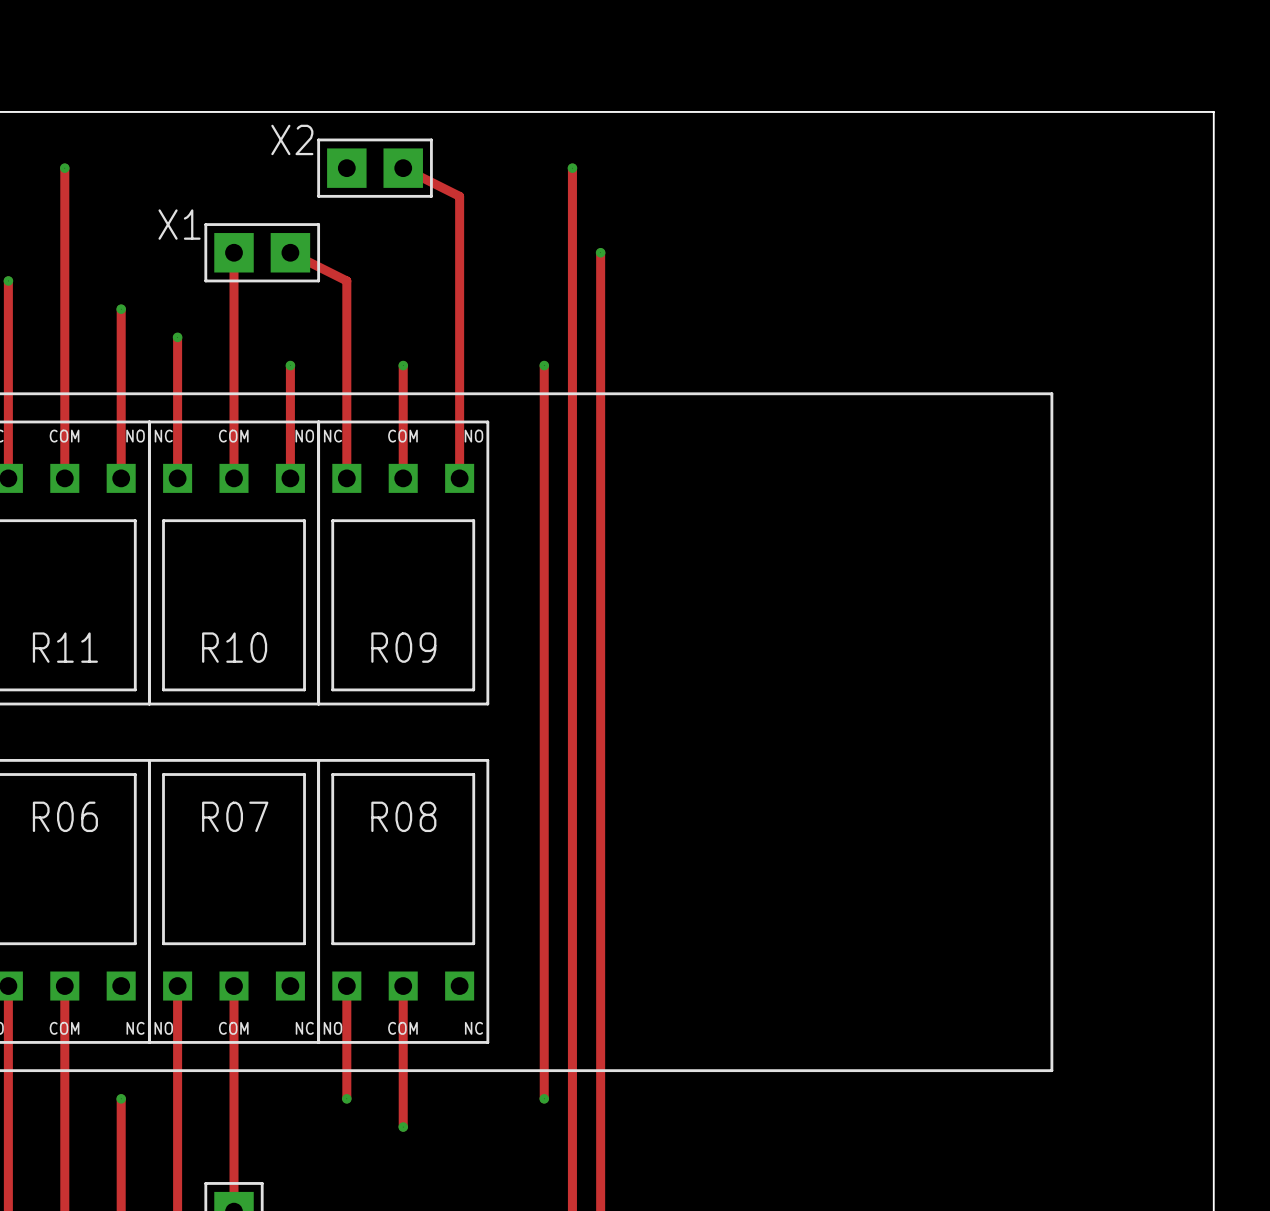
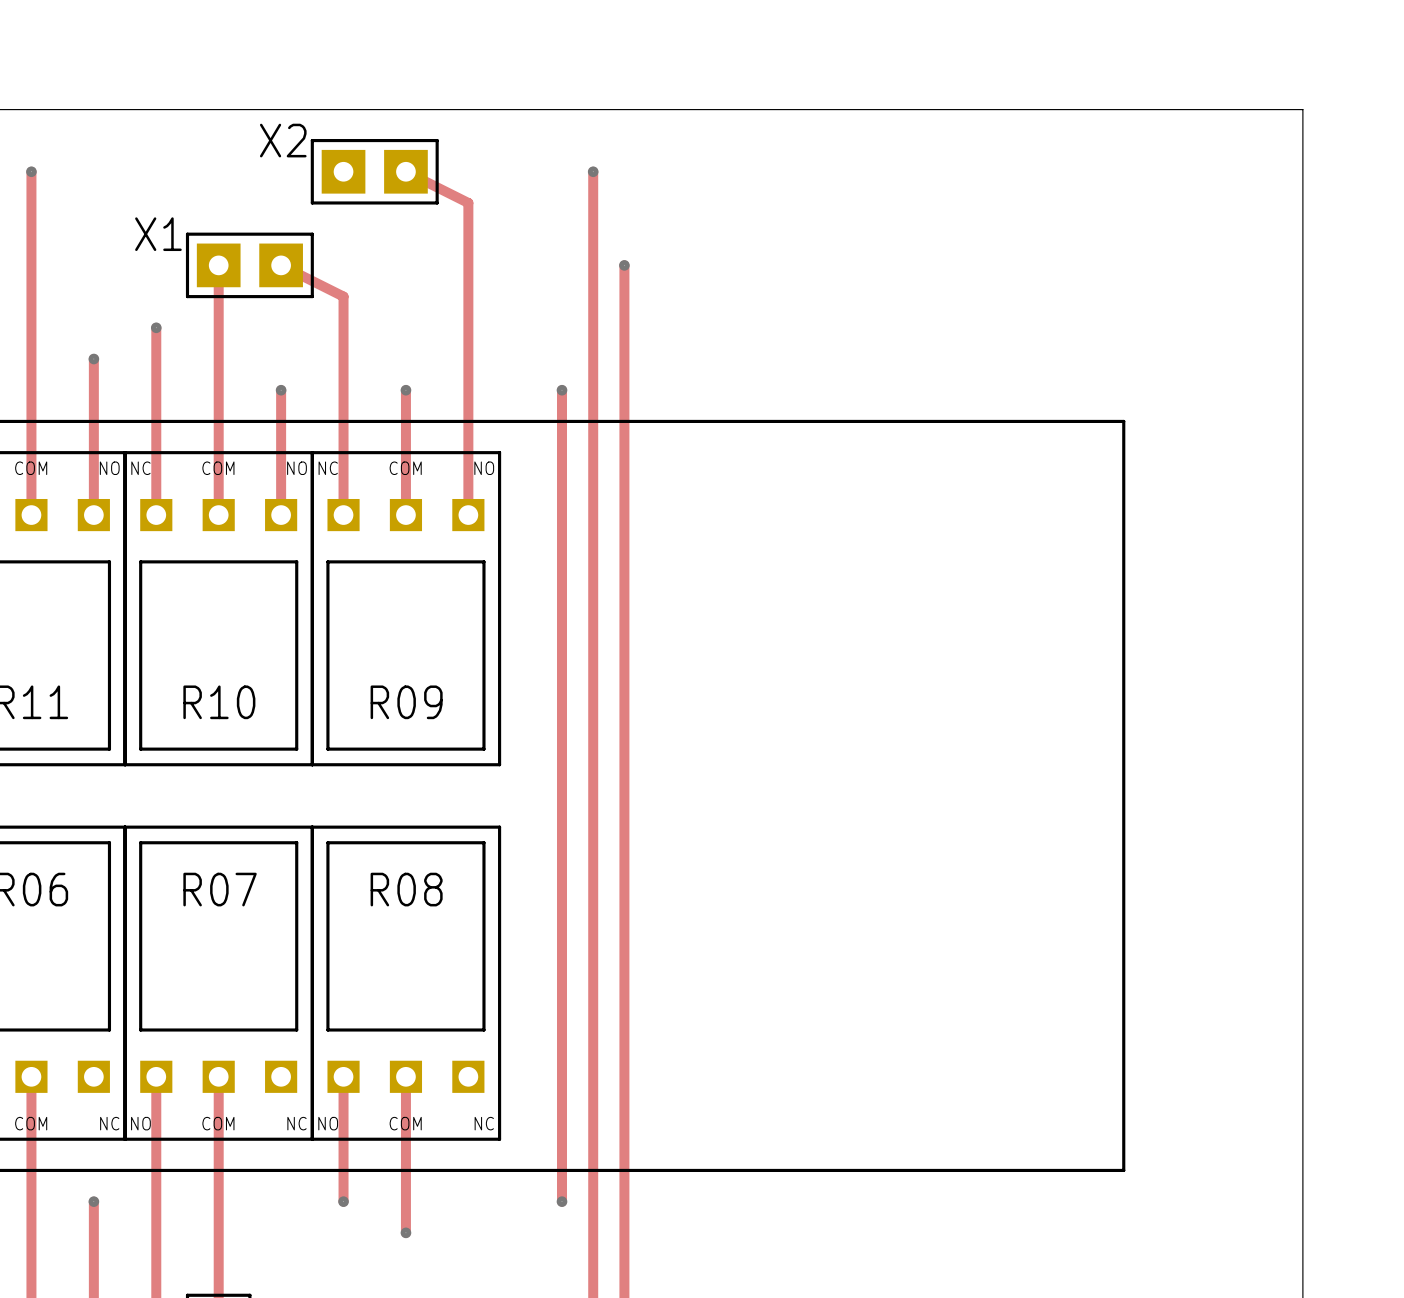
track: (121, 309) (121, 337) -> (156, 327) (156, 359)
via: (121, 309) -> none
via: none -> (156, 327)
via: none -> (93, 359)
via: (177, 337) -> none

